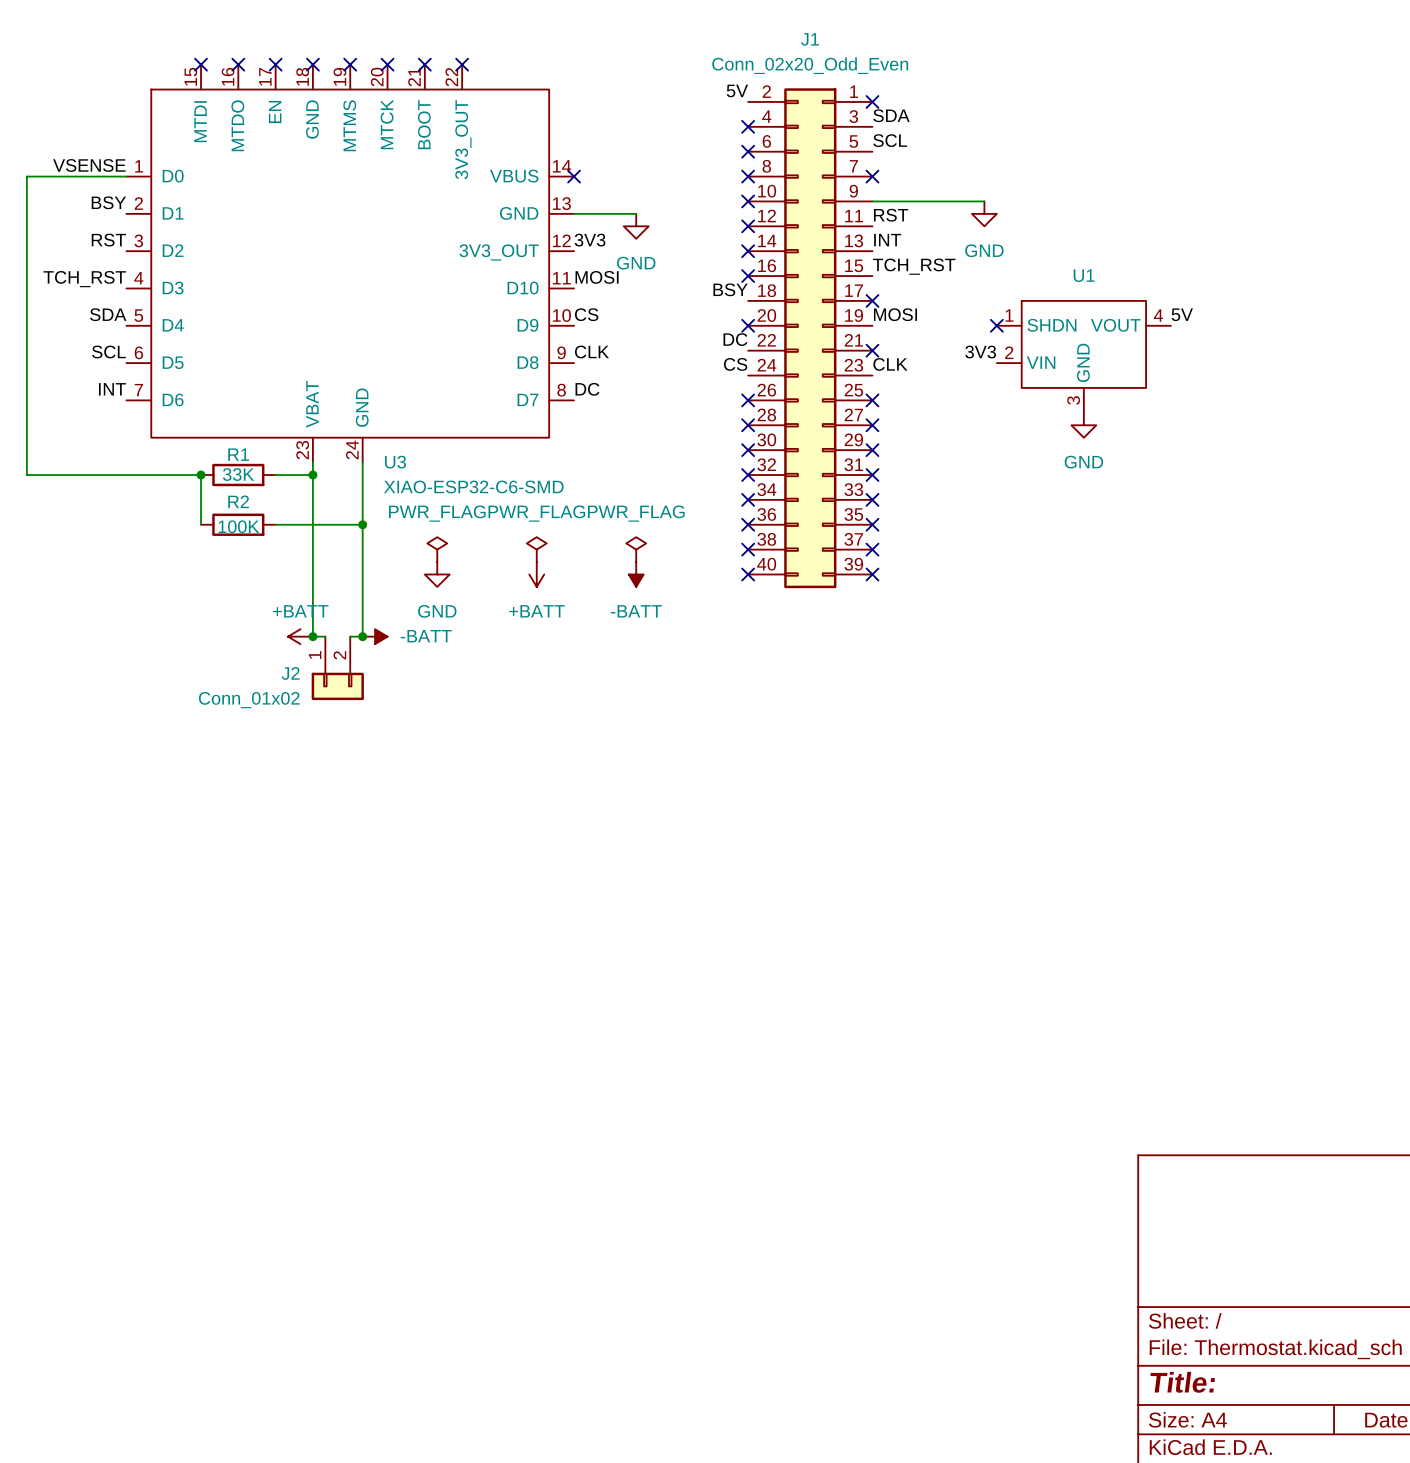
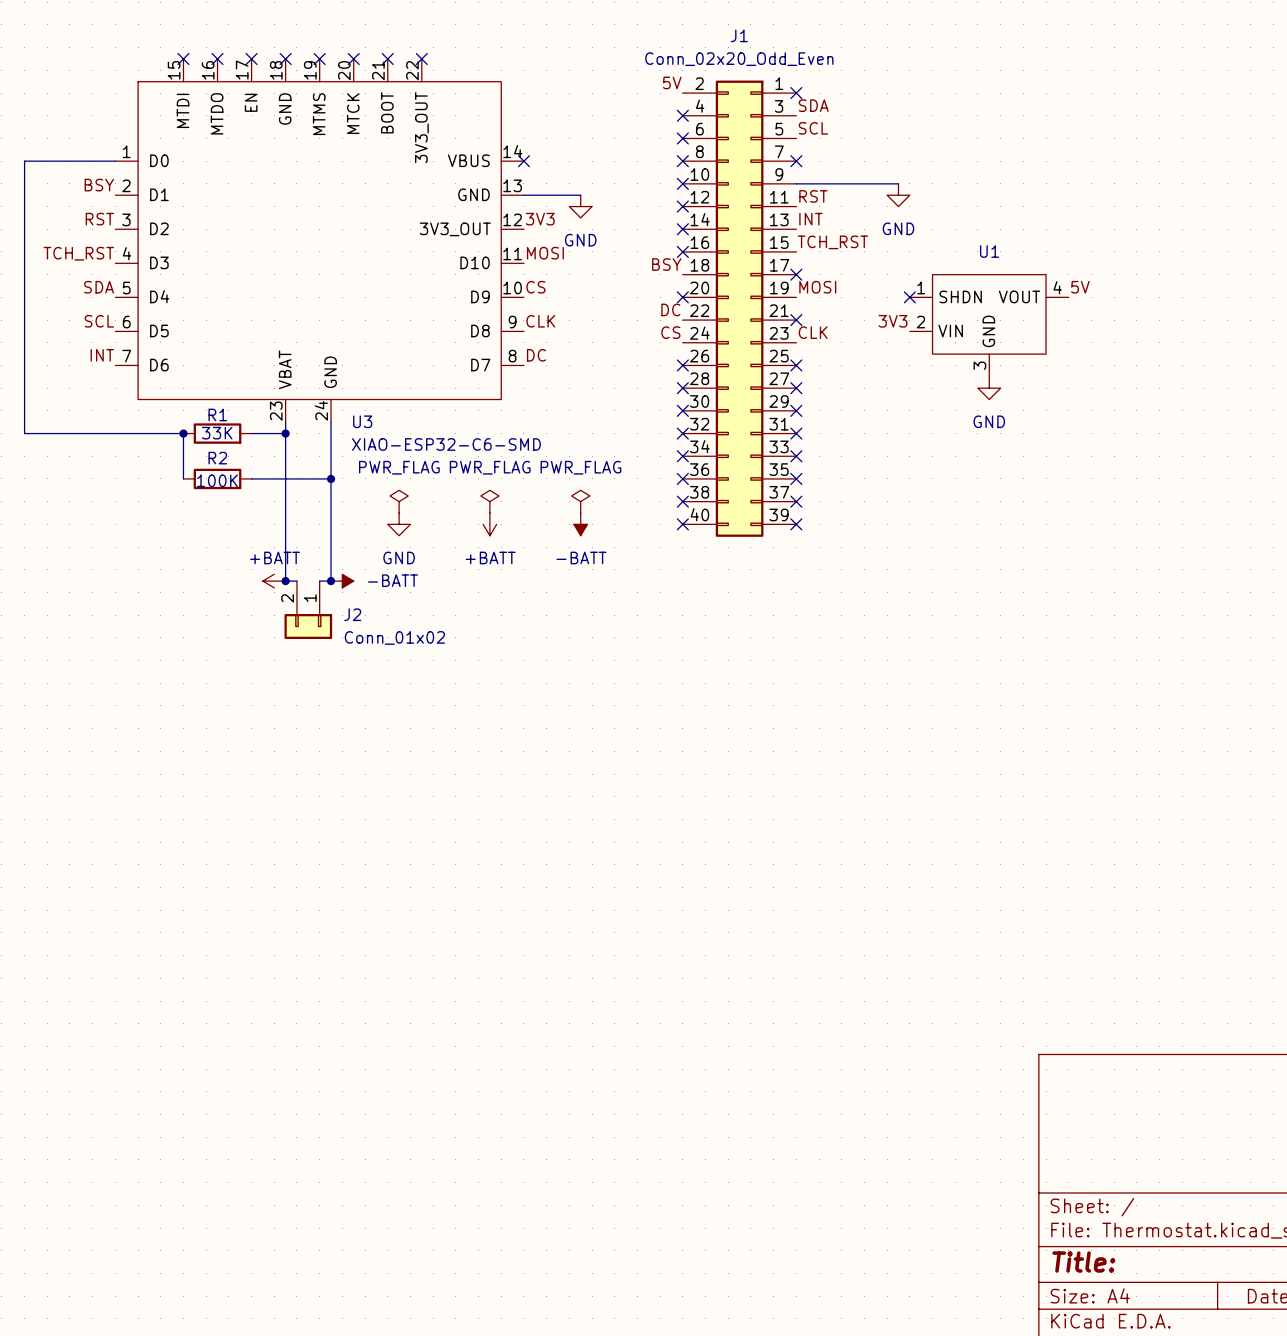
label: VSENSE (89, 165) -> none
J2 flip: as is (337, 686) -> left-right (308, 626)

